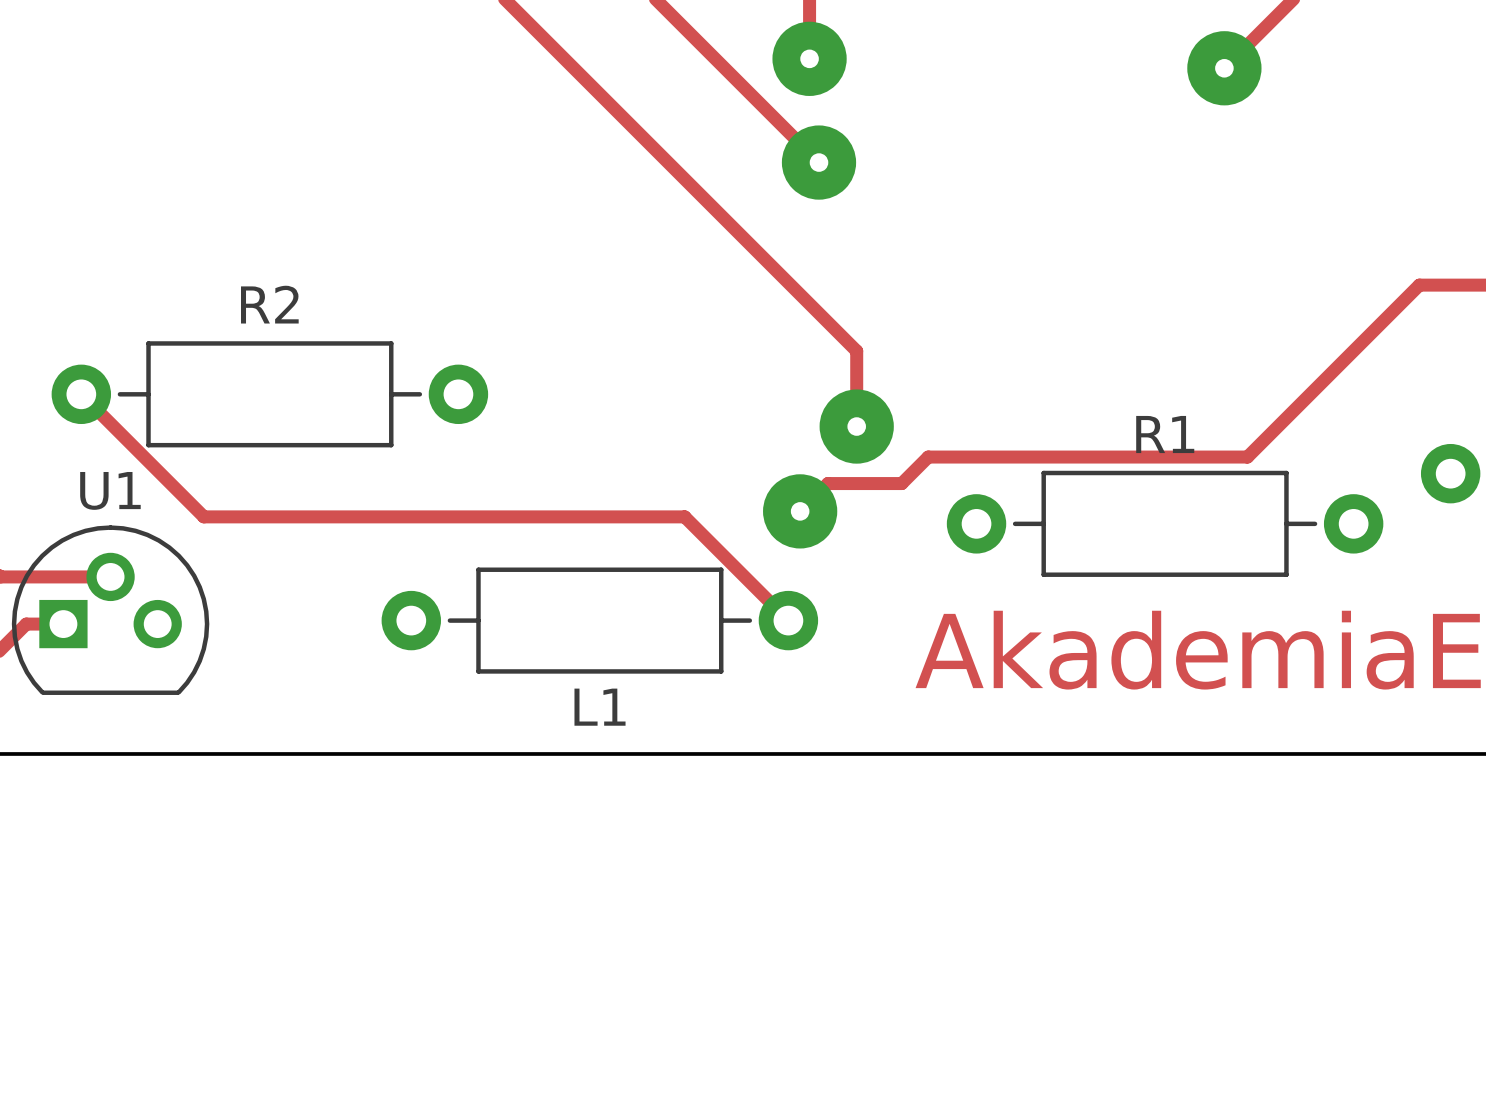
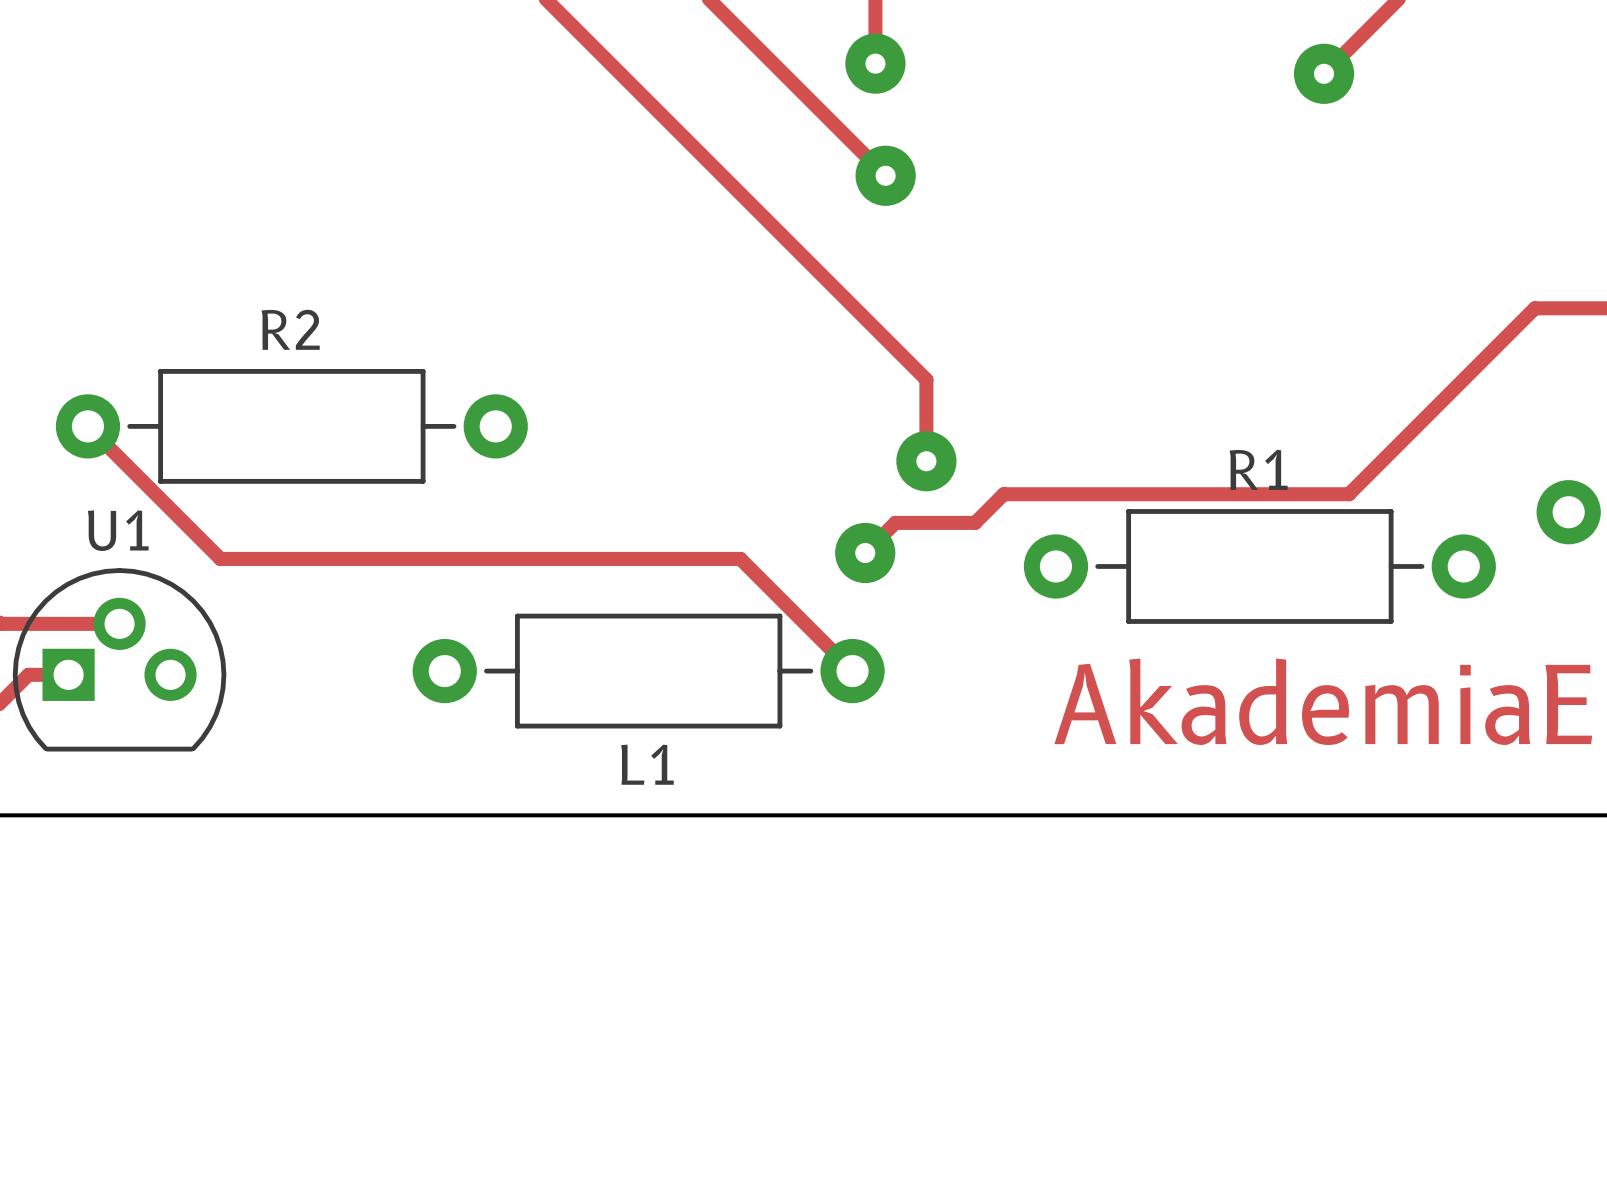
via size: [772, 21, 847, 96] -> [845, 33, 906, 94]
via size: [1187, 31, 1262, 106] -> [1293, 43, 1355, 104]
via size: [781, 125, 857, 200] -> [855, 145, 916, 206]
via size: [819, 389, 894, 464] -> [896, 431, 957, 492]
via size: [763, 474, 838, 549] -> [835, 522, 896, 584]

